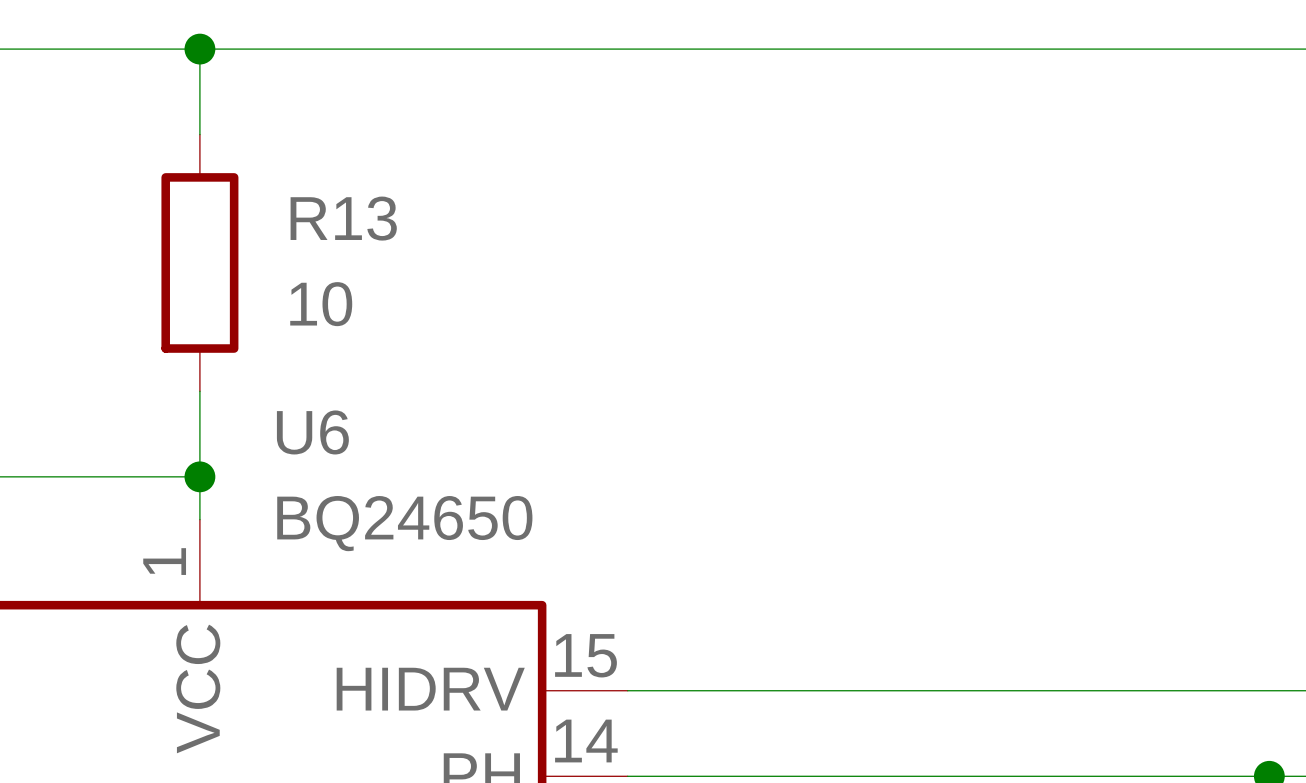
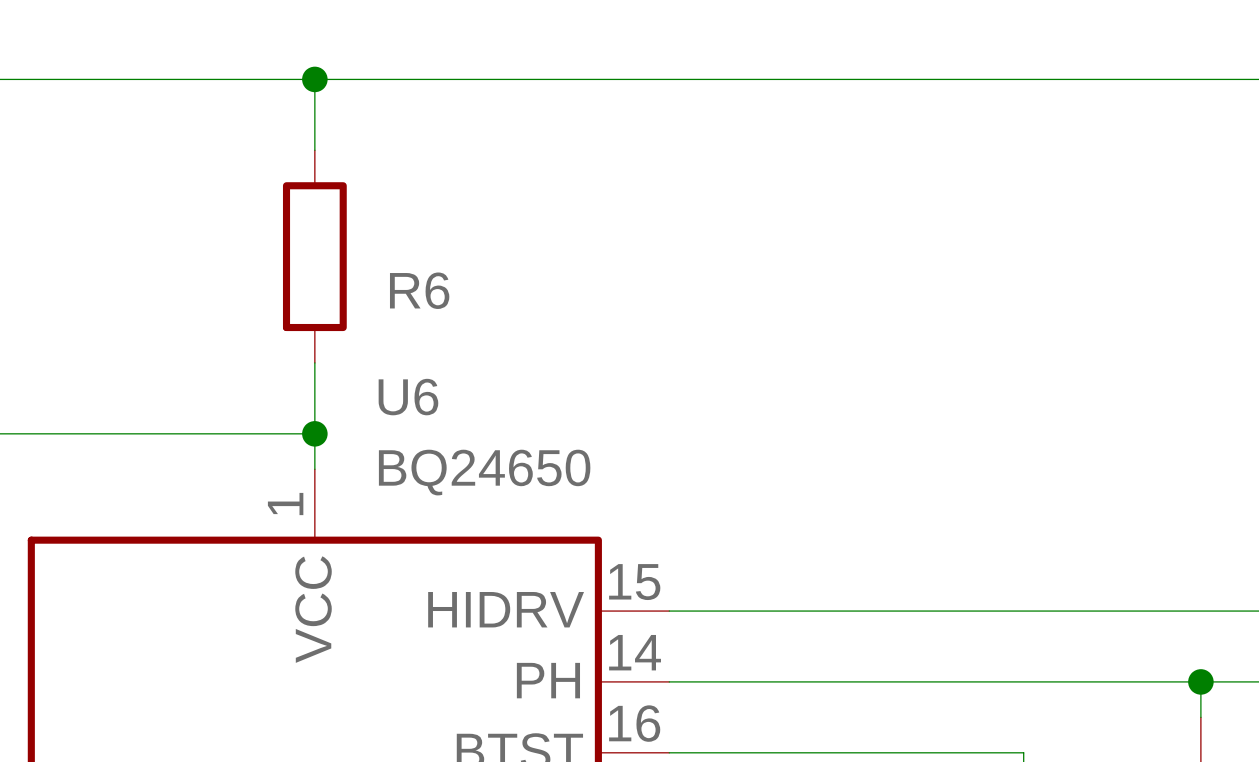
R13 name: R13 (343, 218) -> none
R13 value: 10 (321, 304) -> R6 (419, 290)

